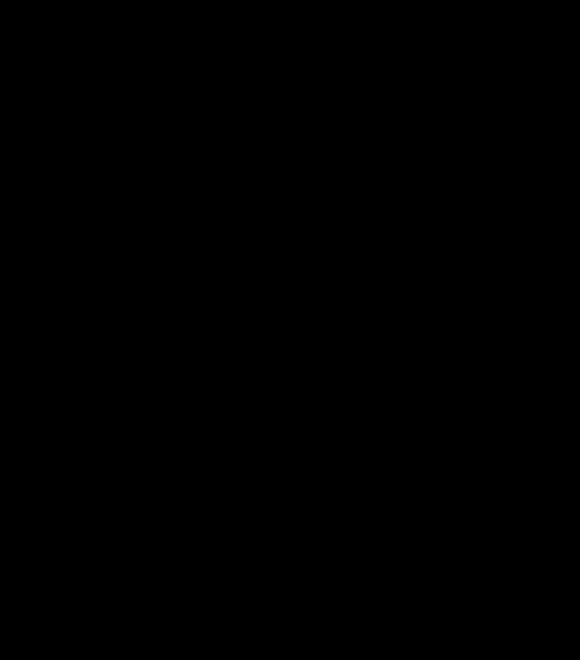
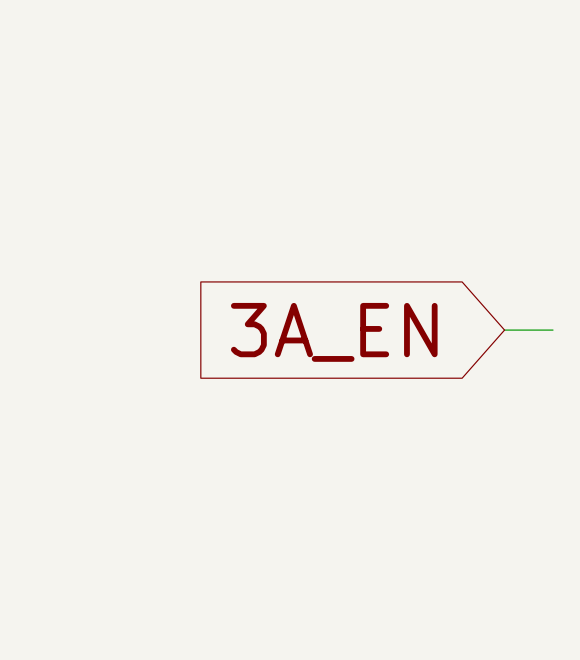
global label: none -> 3A_EN (334, 332)
wire: none -> (504, 330) (553, 330)

